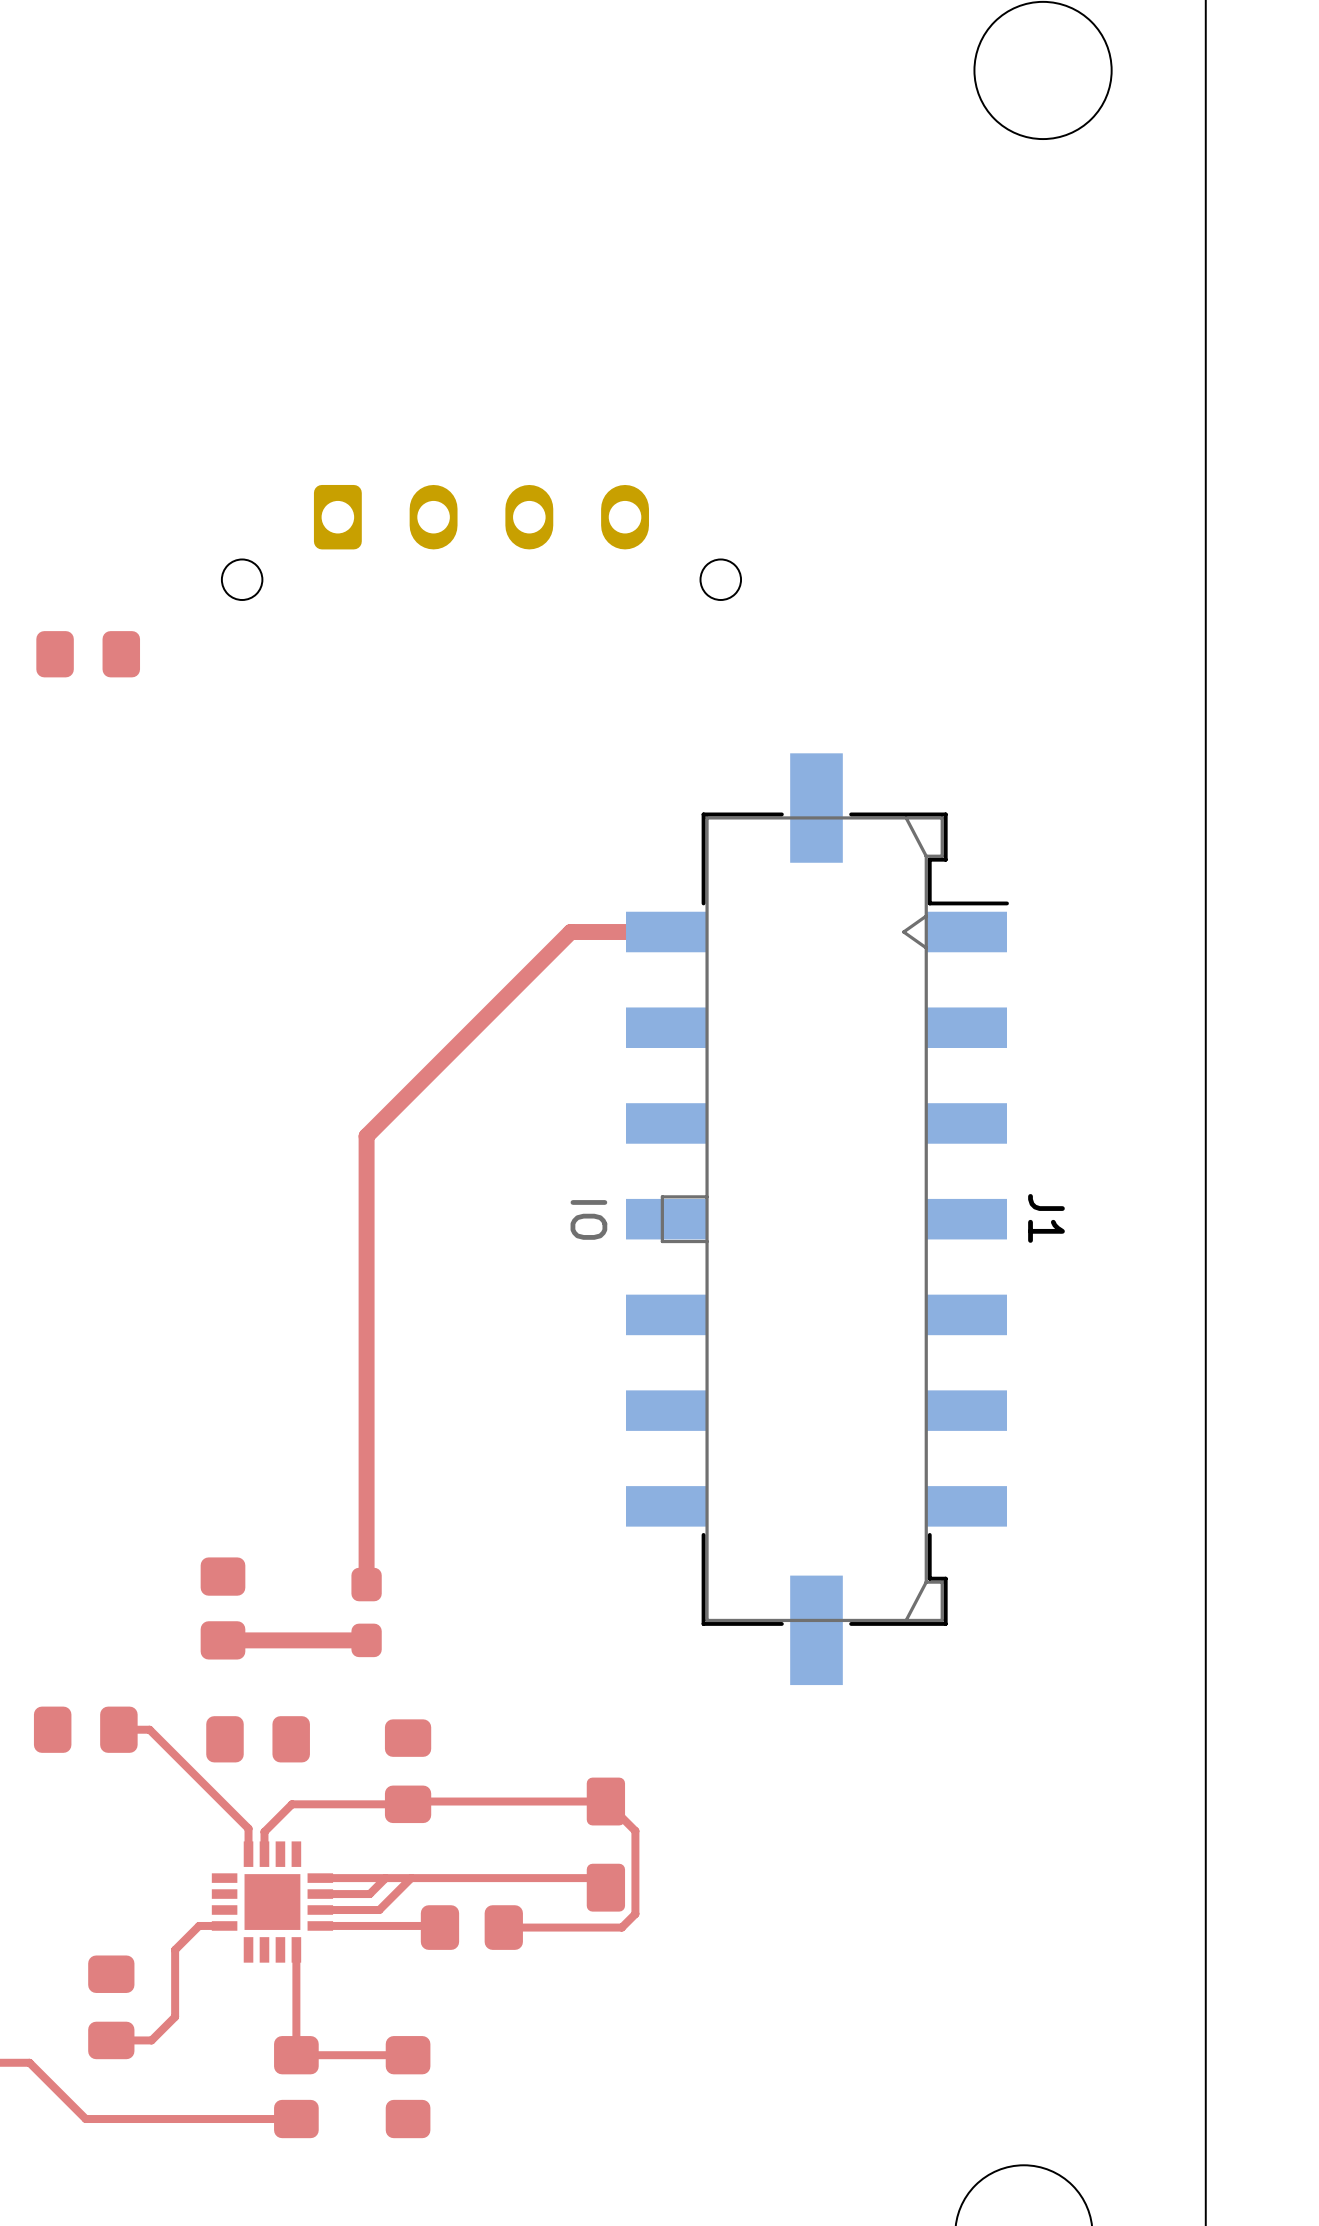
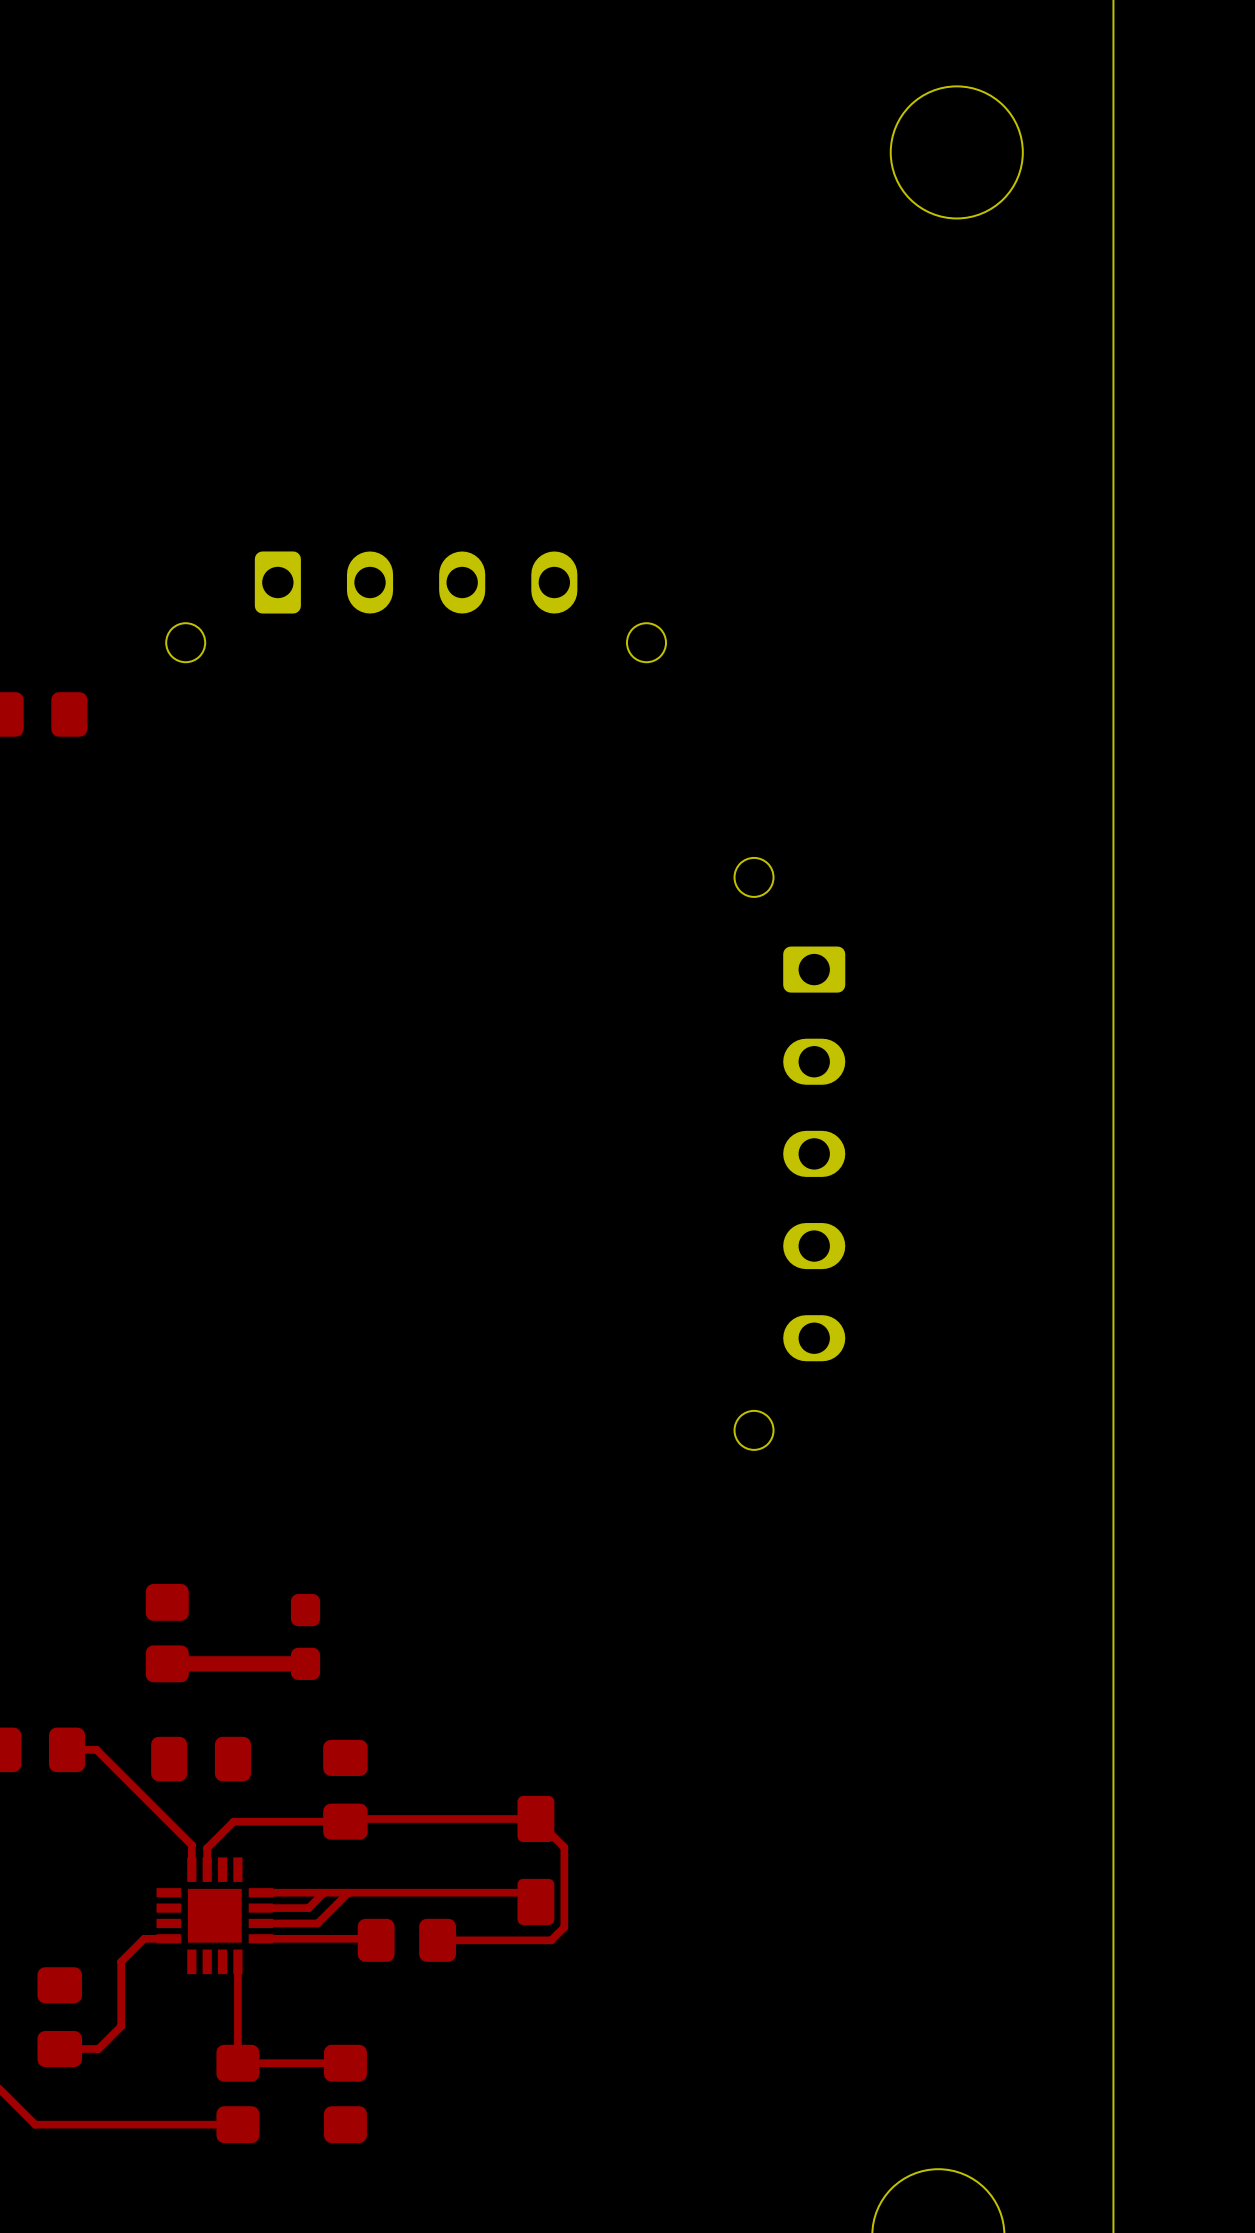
top track: (666, 932) (570, 932) (366, 1136) (366, 1584) -> none
part: none -> (789, 1153)
J1: IO (817, 1219) -> none

